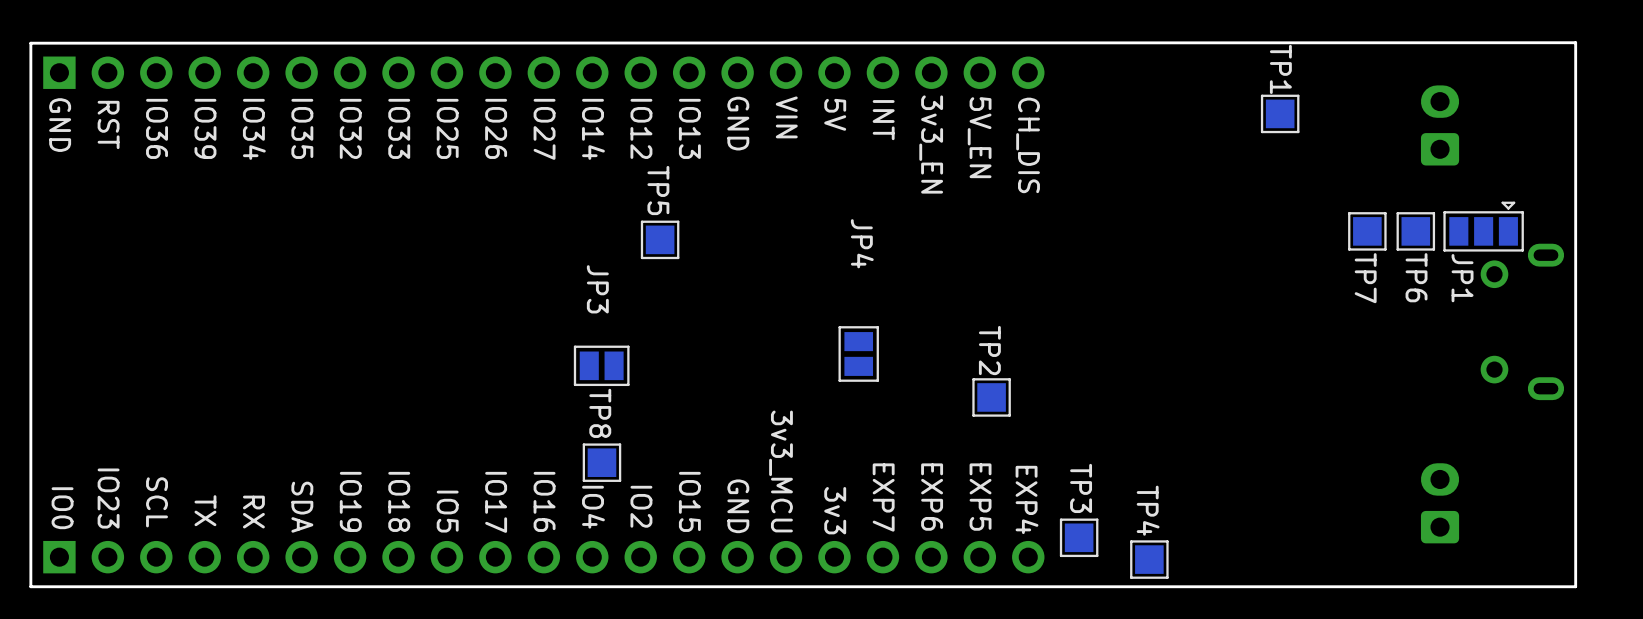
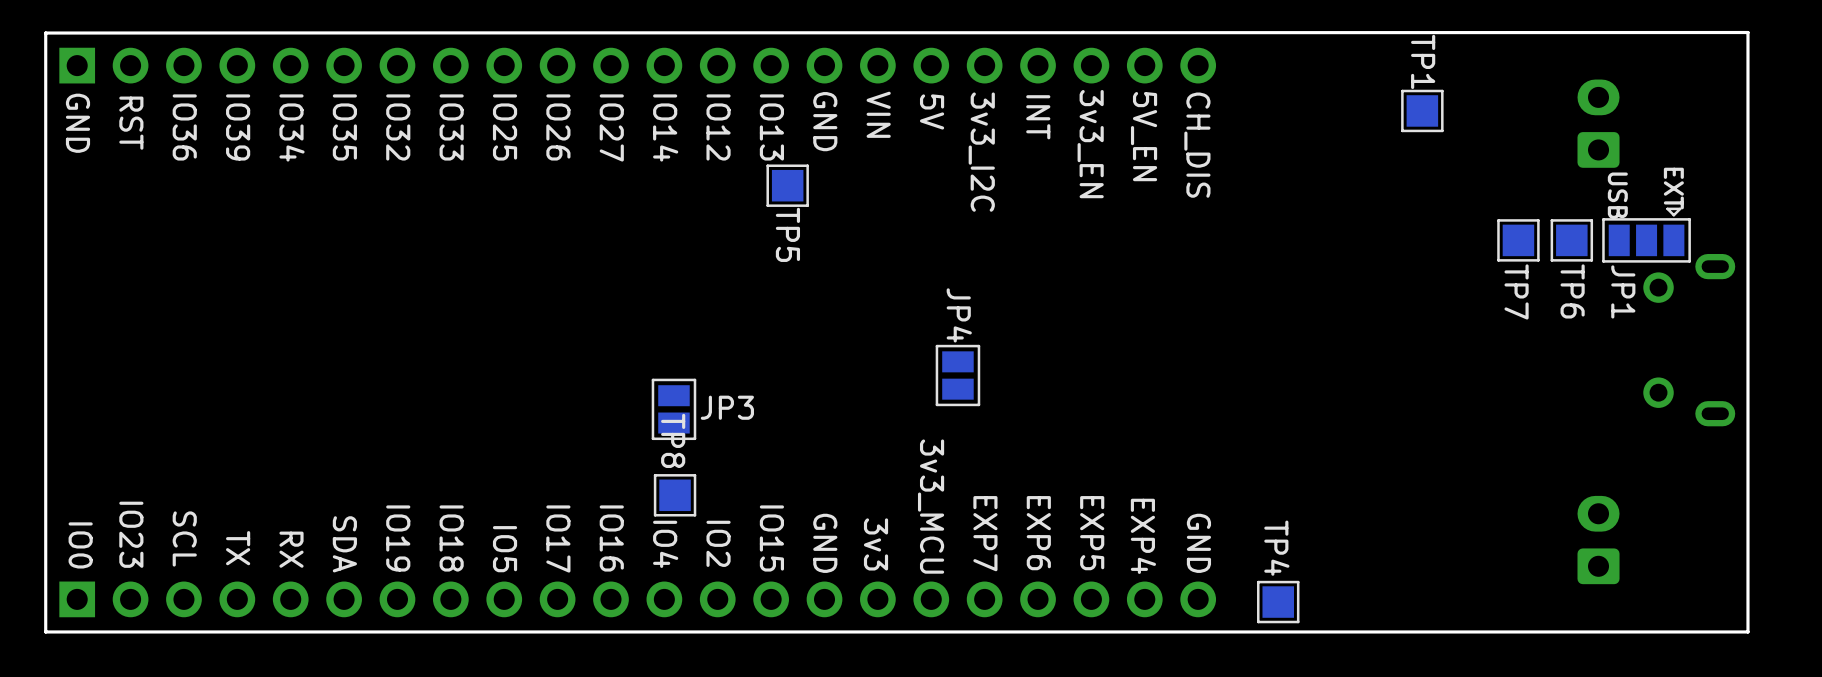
part: none -> (637, 65)
text position: INT (883, 120) -> INT (1038, 117)
text position: 5V_EN (979, 137) -> 5V_EN (1144, 136)
text position: 3v3_EN (931, 144) -> 3v3_EN (1090, 144)
text position: CH_DIS (1028, 145) -> CH_DIS (1197, 145)
text: none -> 3v3_I2C (981, 152)
text: none -> EXT (1673, 188)
TP5 name position: TP5 (658, 190) -> TP5 (787, 234)
text: none -> USB (1617, 195)
TP5 position: (660, 239) -> (787, 185)
JP4 name position: JP4 (862, 243) -> JP4 (959, 315)
JP3 rotation: 0° (601, 365) -> 90° clockwise (673, 409)
TP2: (991, 397) -> none
text position: 3v3_MCU (781, 471) -> 3v3_MCU (931, 506)
text: none -> GND (1198, 543)
text position: 3v3 (835, 510) -> 3v3 (876, 544)
TP3: (1079, 537) -> none
part: none -> (637, 599)

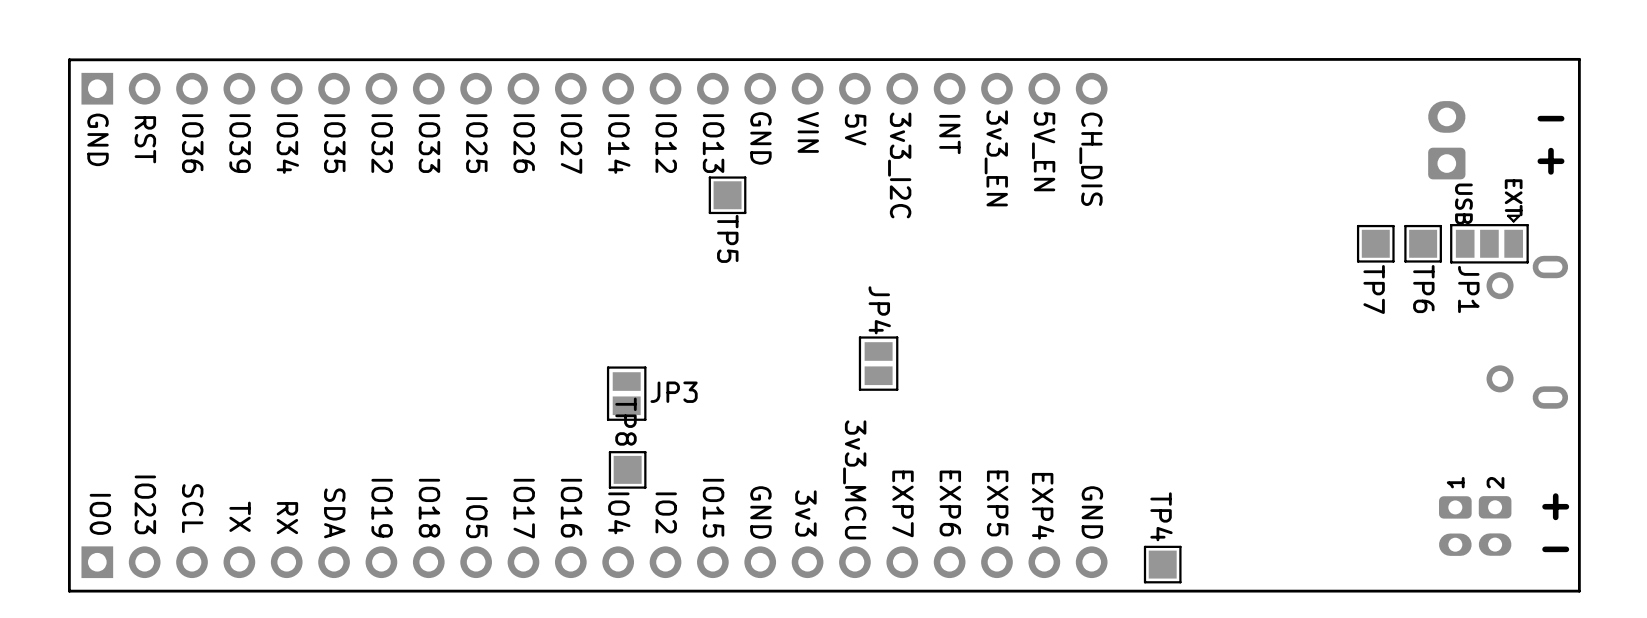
text: none -> - (1550, 118)
TP1: (1422, 110) -> none
text: none -> + (1550, 161)
part footprint: [1577, 495, 1620, 585] -> [1439, 496, 1472, 556]
text: none -> 1 (1455, 482)
text: none -> 2 (1495, 483)
text: none -> + (1555, 506)
part: none -> (1495, 525)
text: none -> - (1555, 549)

